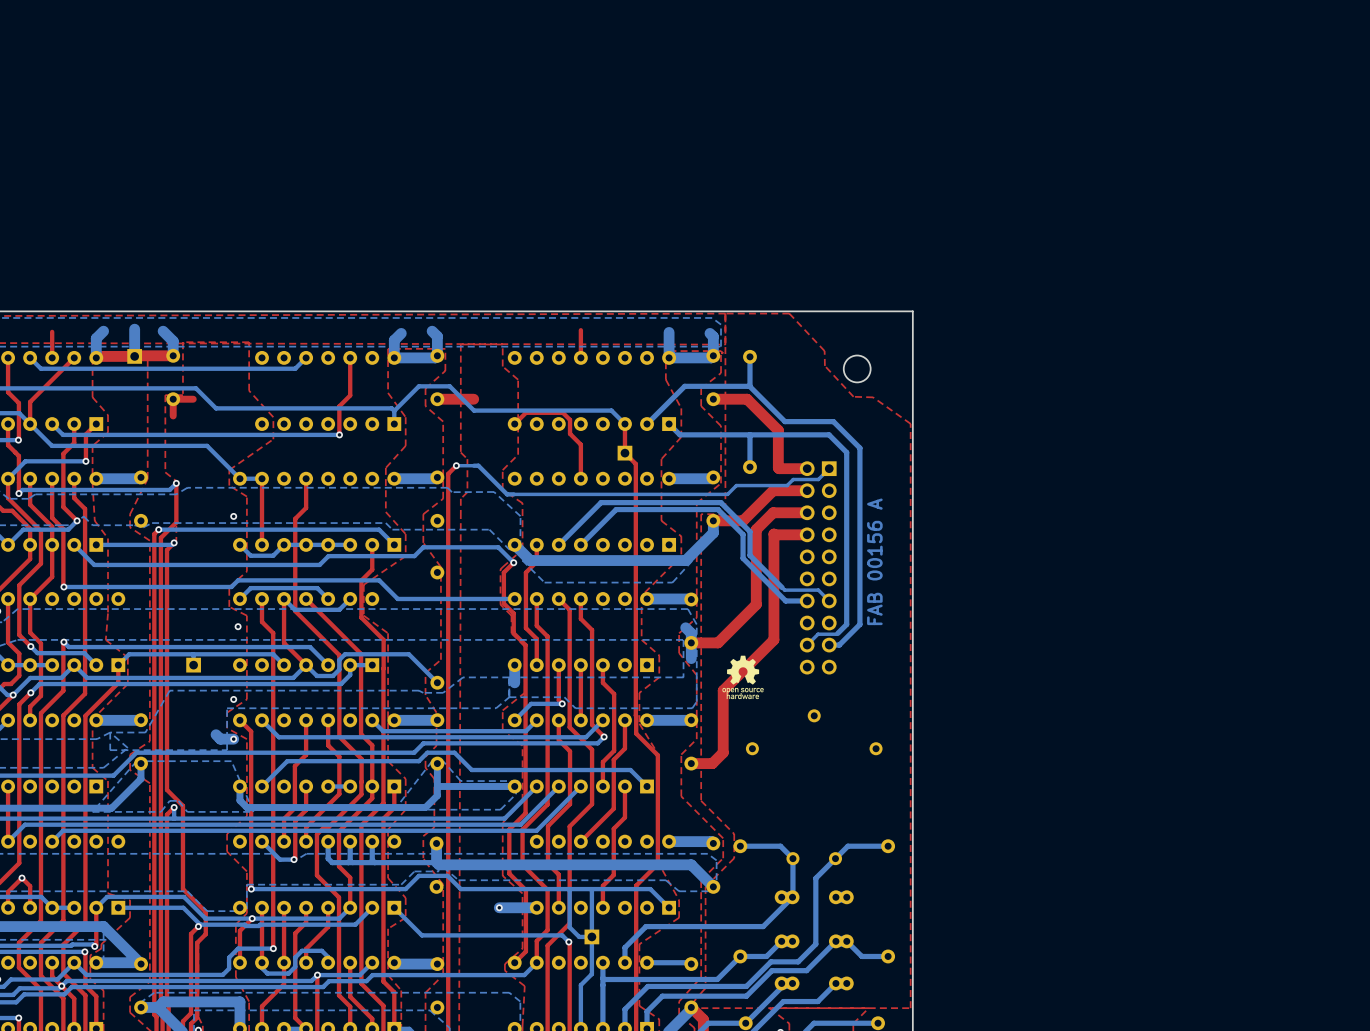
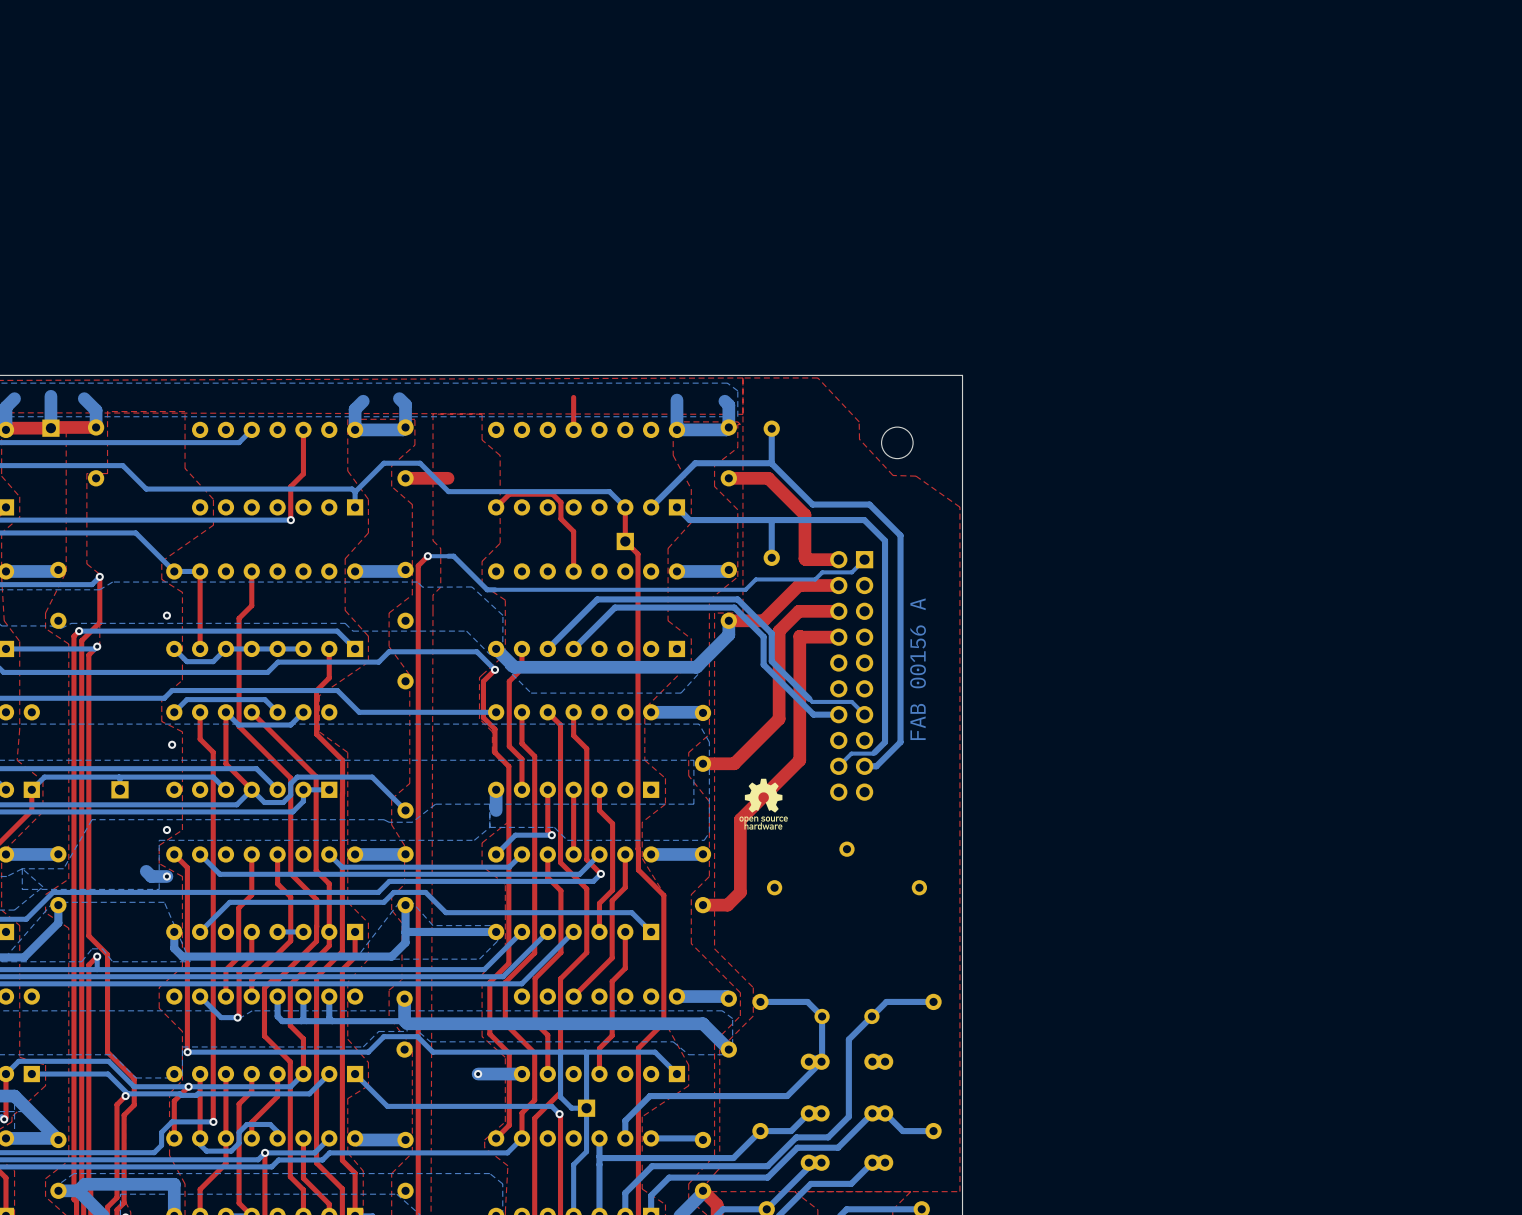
top track: (193, 399) (173, 399) (173, 415) -> none
bottom track: (685, 627) (691, 633) (691, 658) -> none

